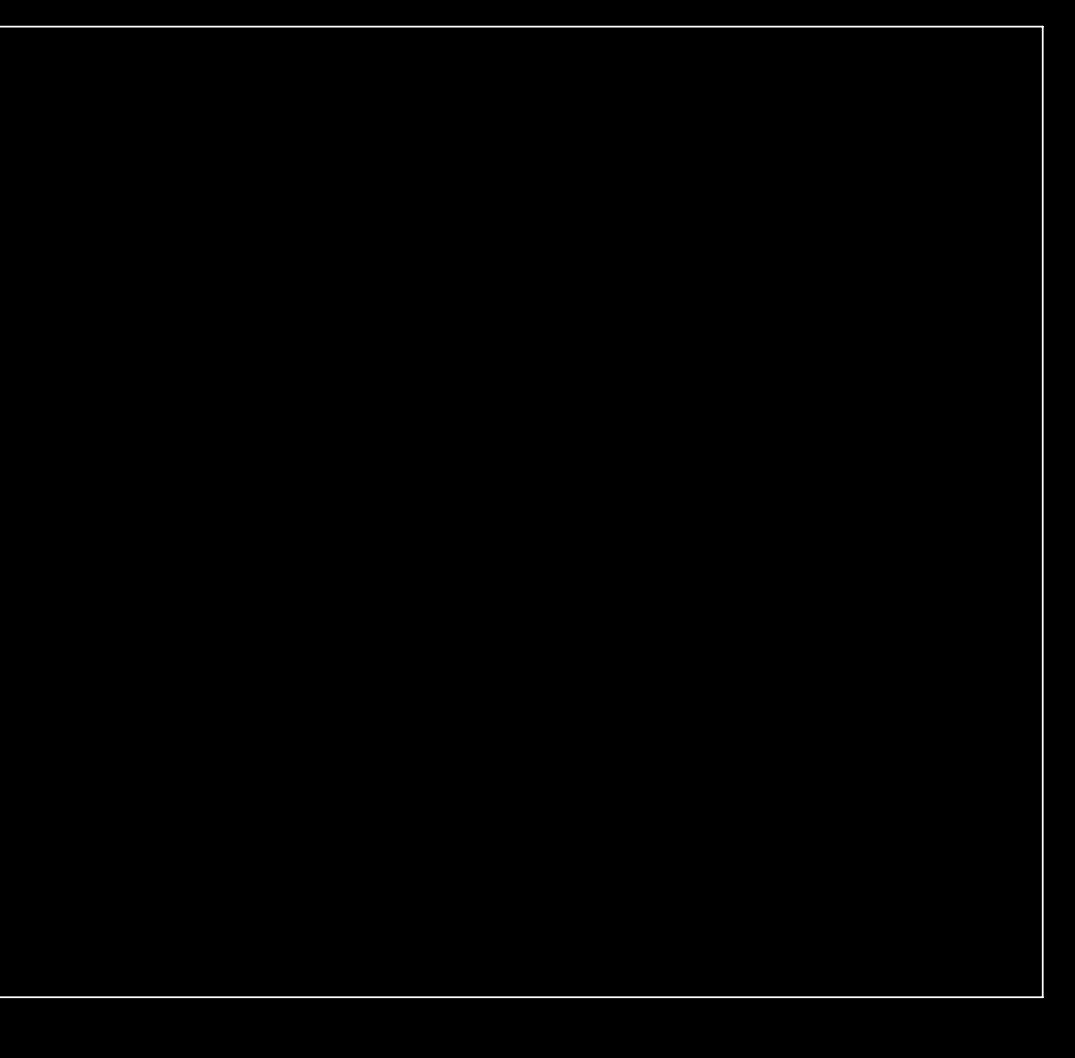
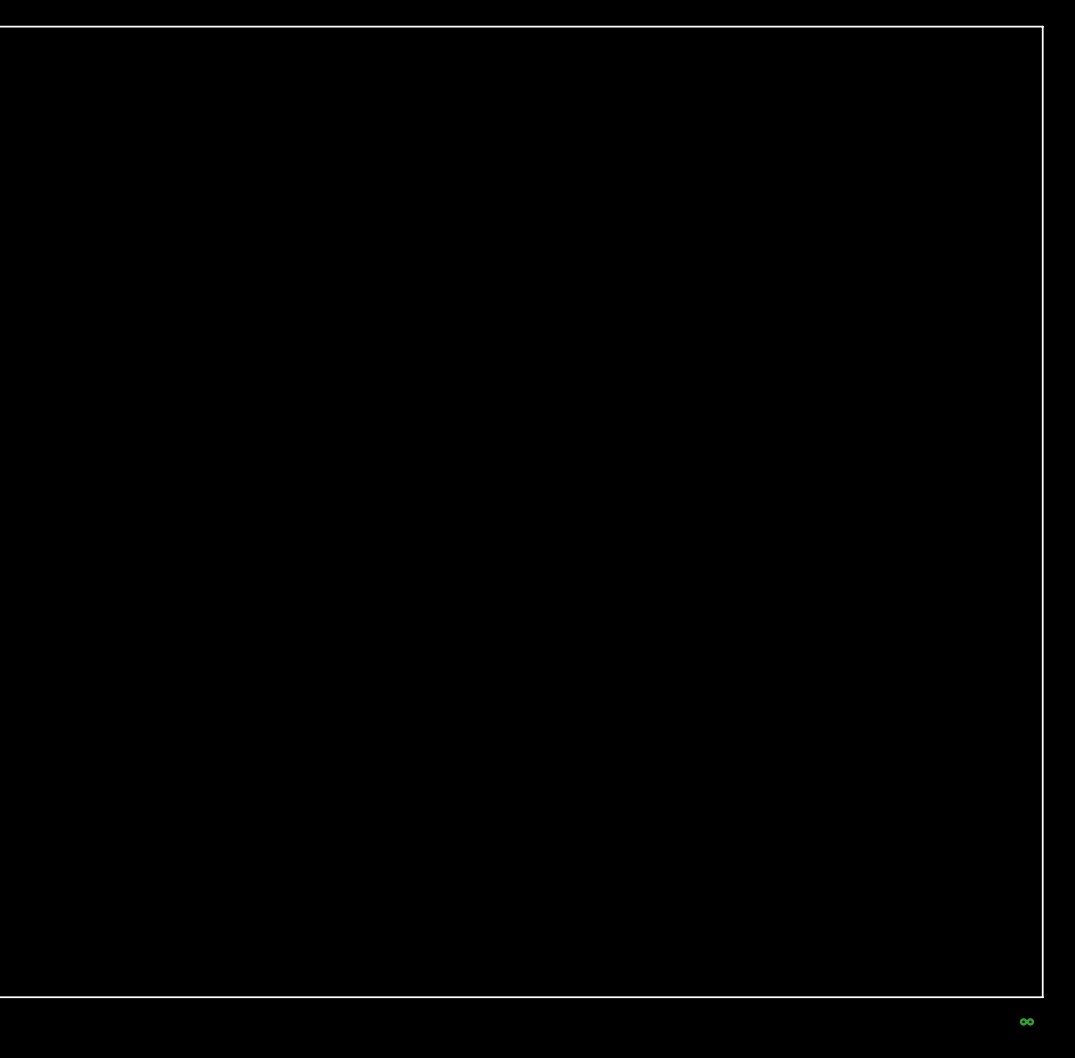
part: none -> (1026, 1021)

